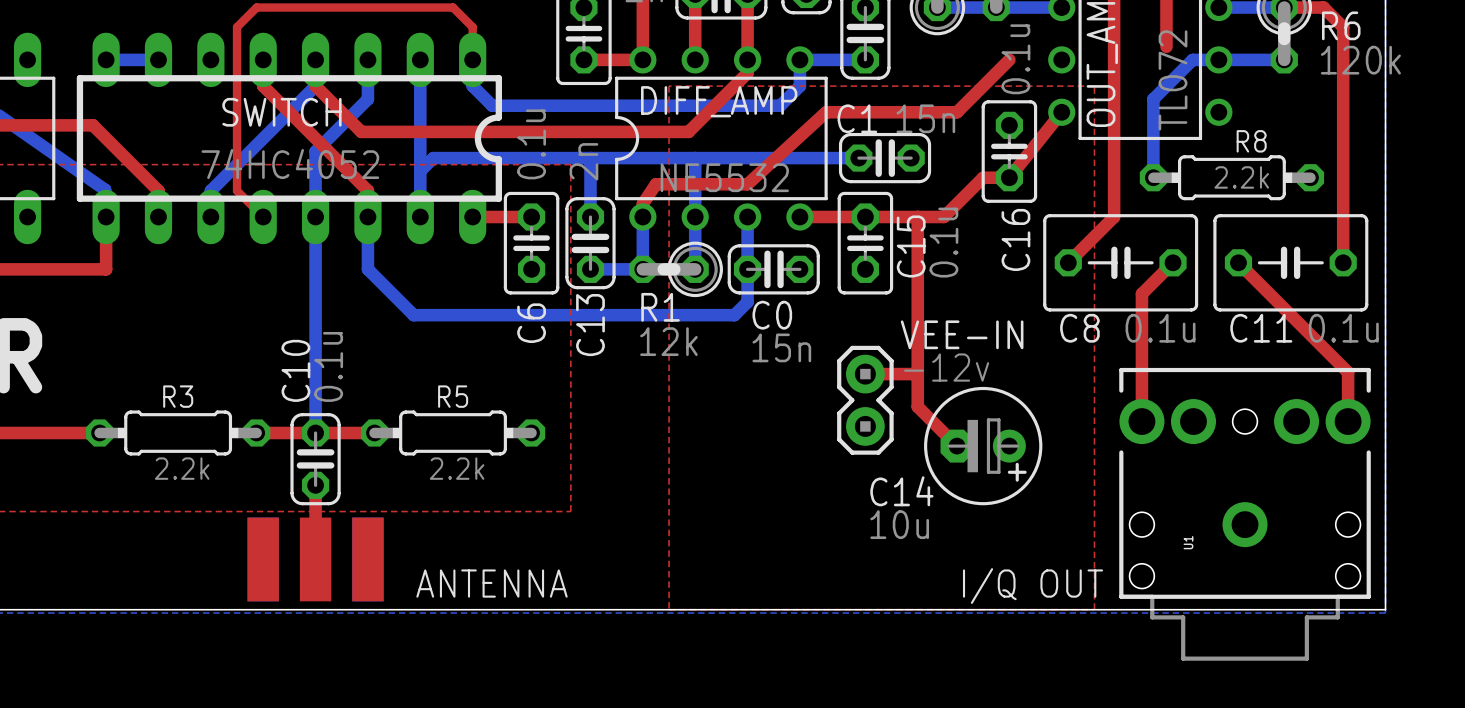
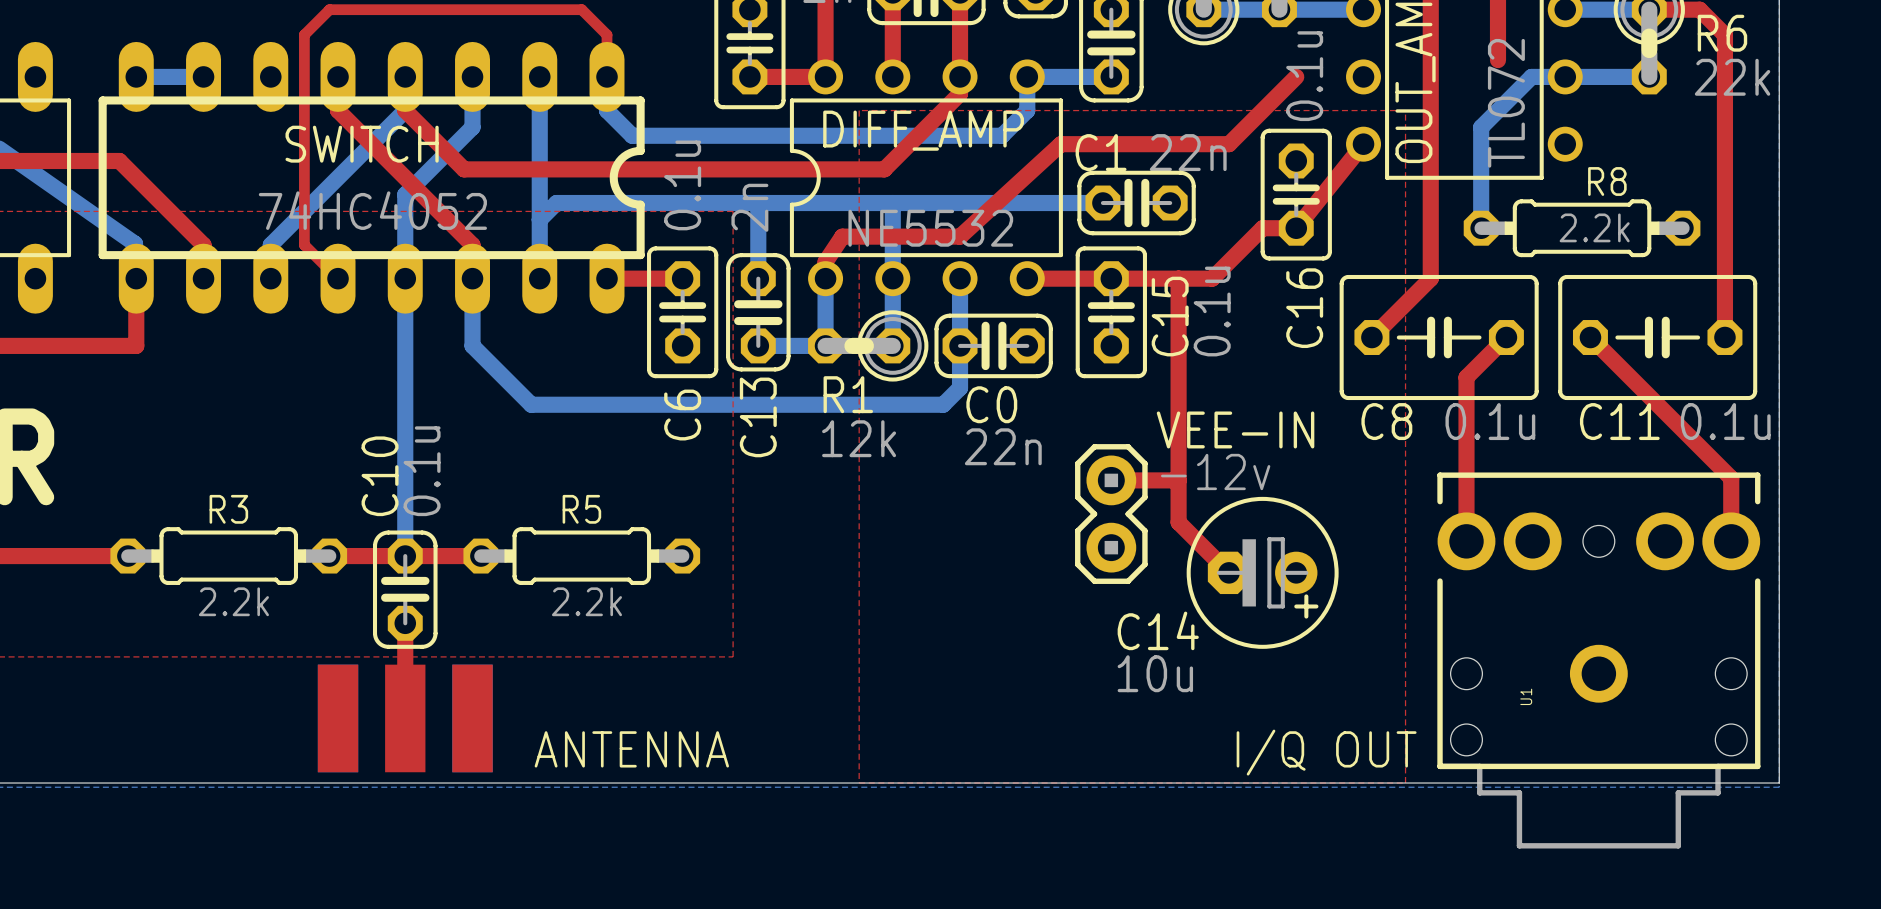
R6 value: 120k (1360, 60) -> 22k (1732, 77)
C1 value: 15n (925, 118) -> 22n (1188, 152)
C0 value: 15n (781, 347) -> 22n (1003, 446)

